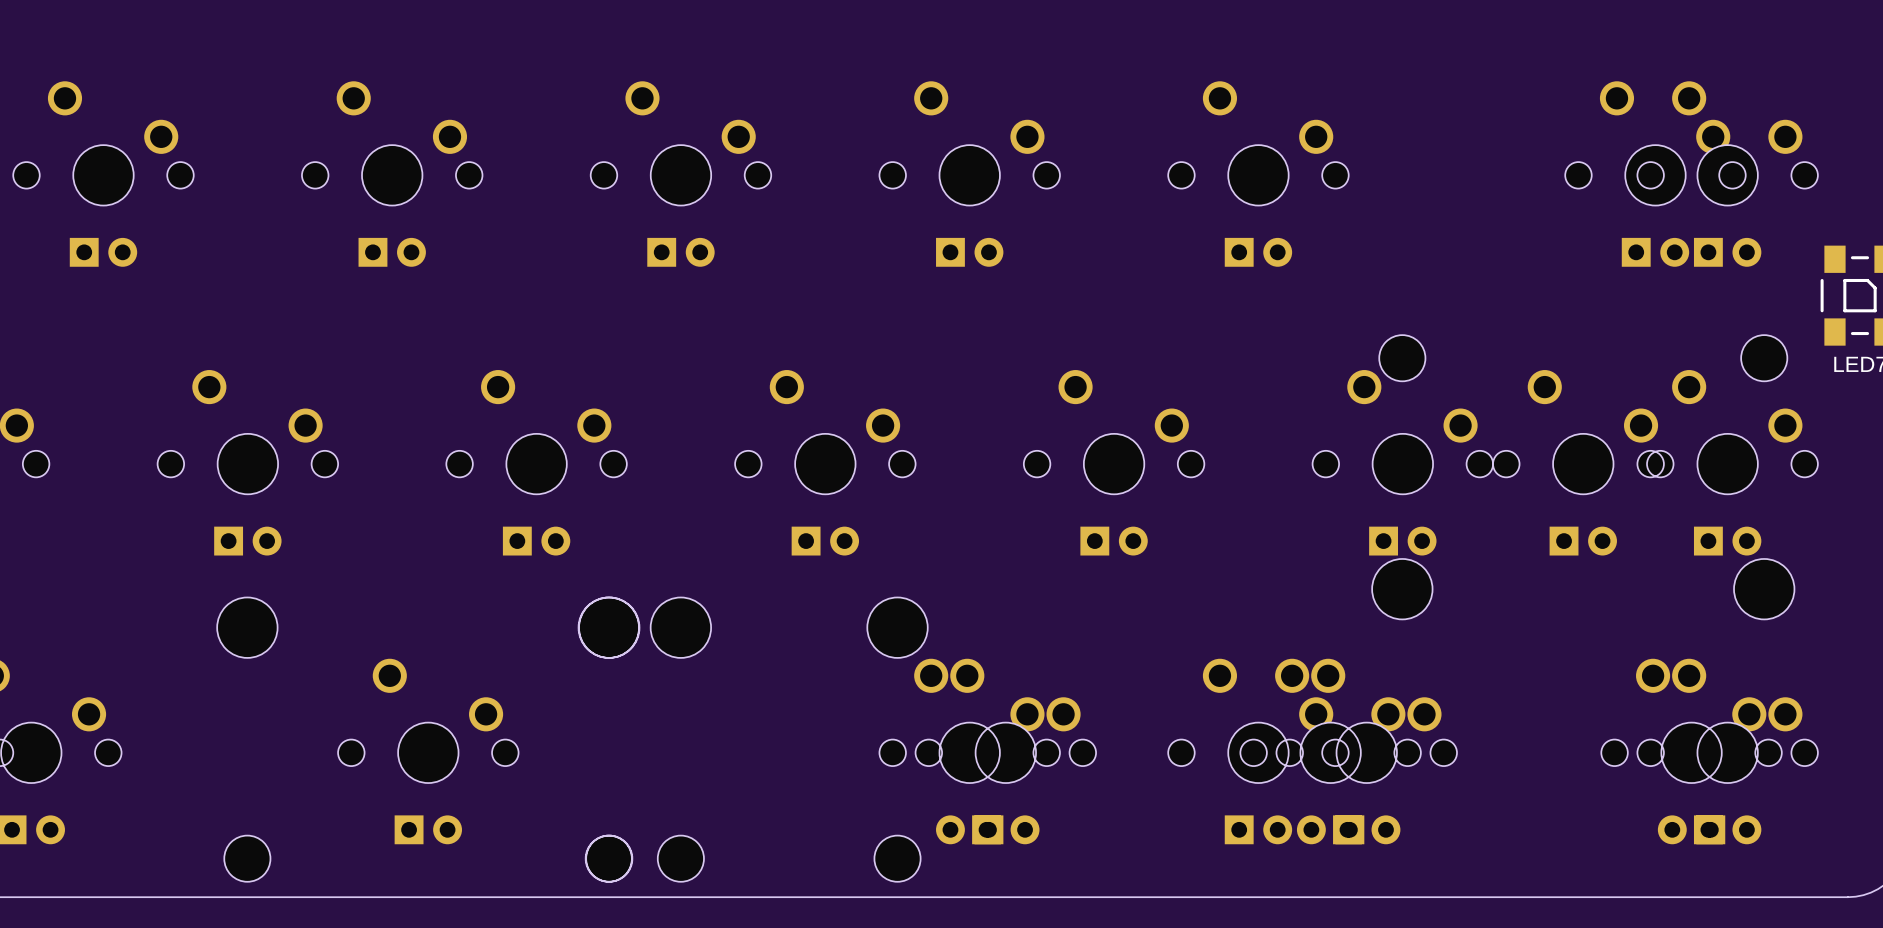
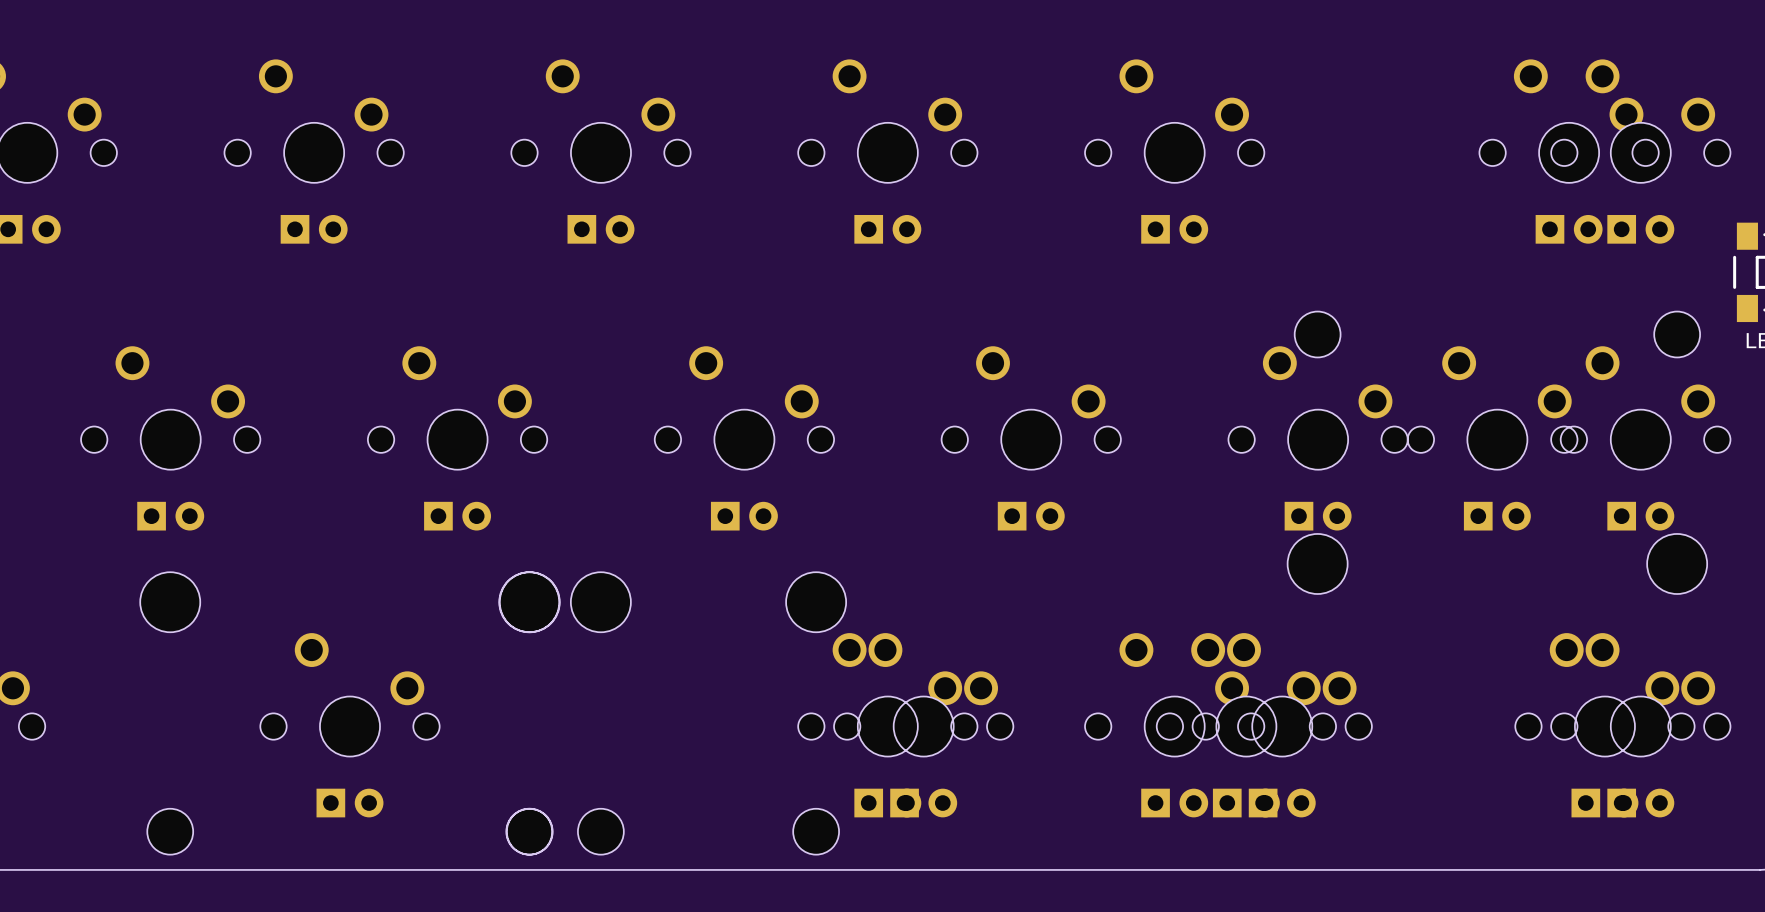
part footprint: [879, 658, 1060, 845] -> [798, 633, 978, 818]
part footprint: [1240, 658, 1421, 845] -> [1156, 633, 1337, 818]
part footprint: [1601, 658, 1782, 845] -> [1515, 633, 1695, 818]

